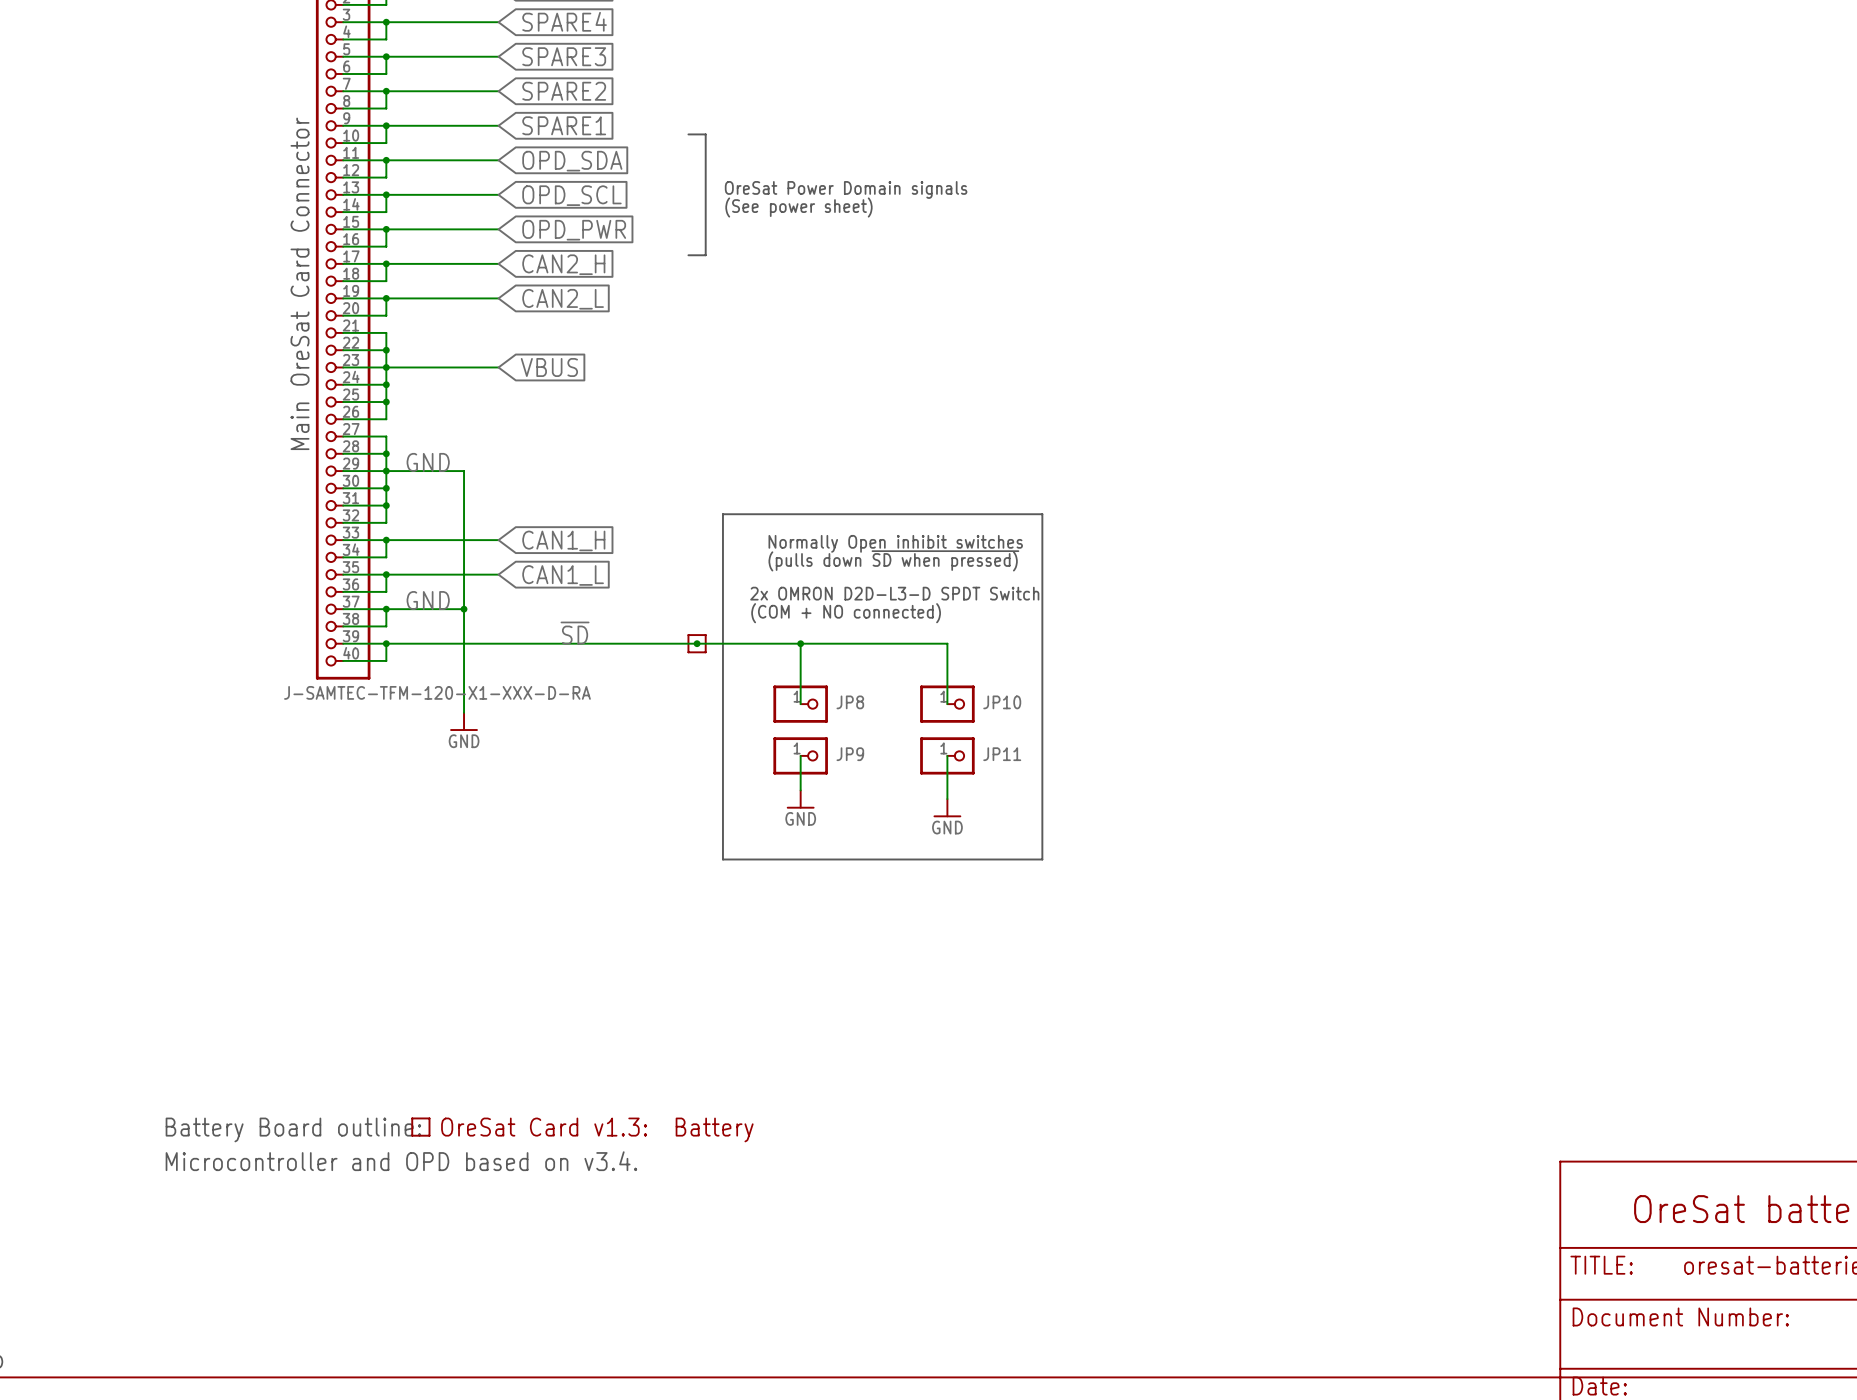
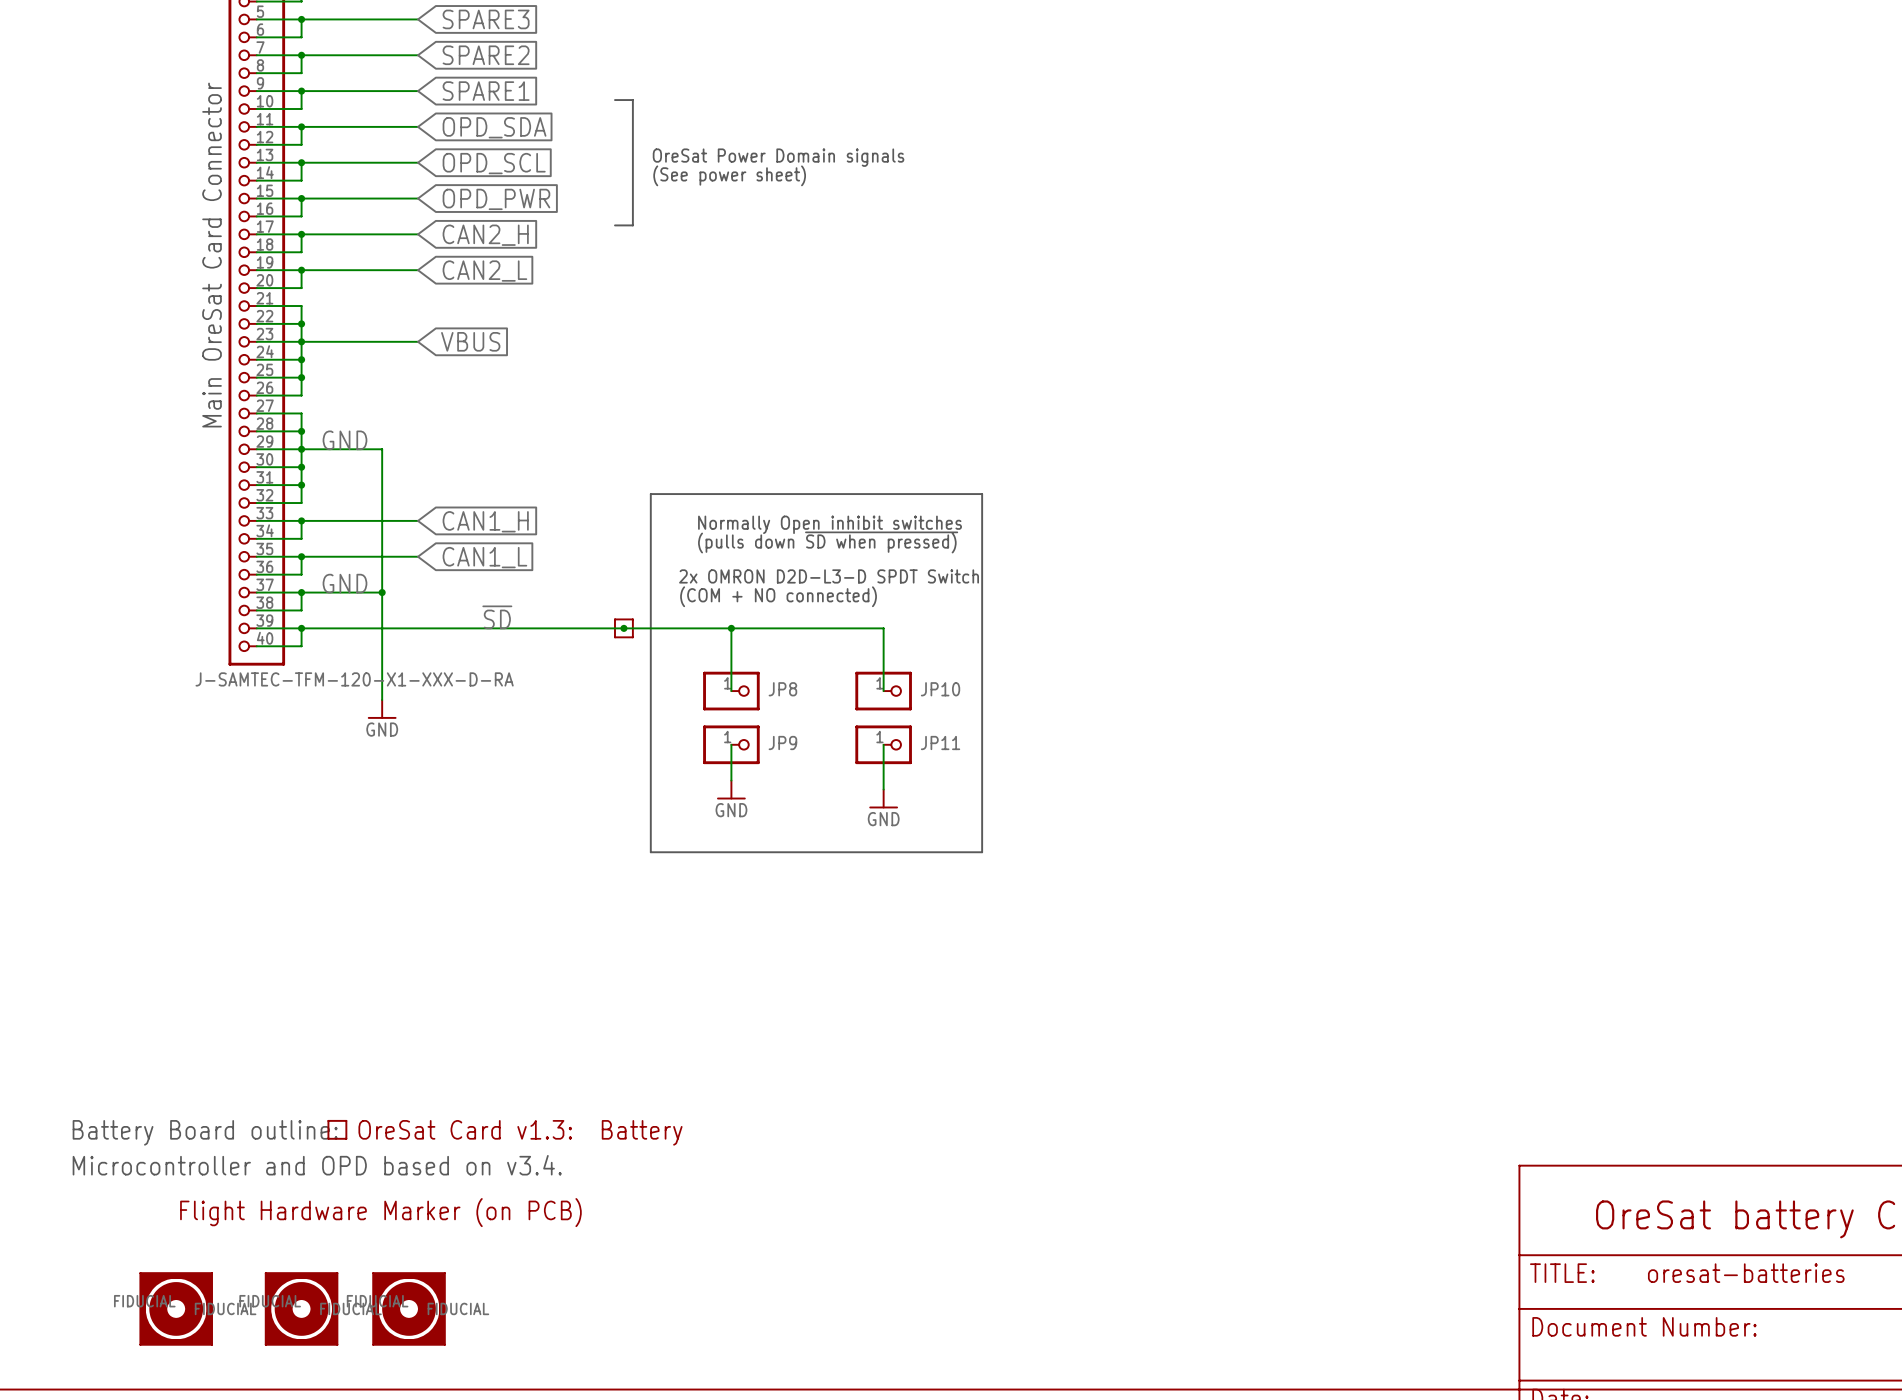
part: none -> (380, 1212)
part: none -> (176, 1308)
part: none -> (301, 1308)
part: none -> (409, 1308)

